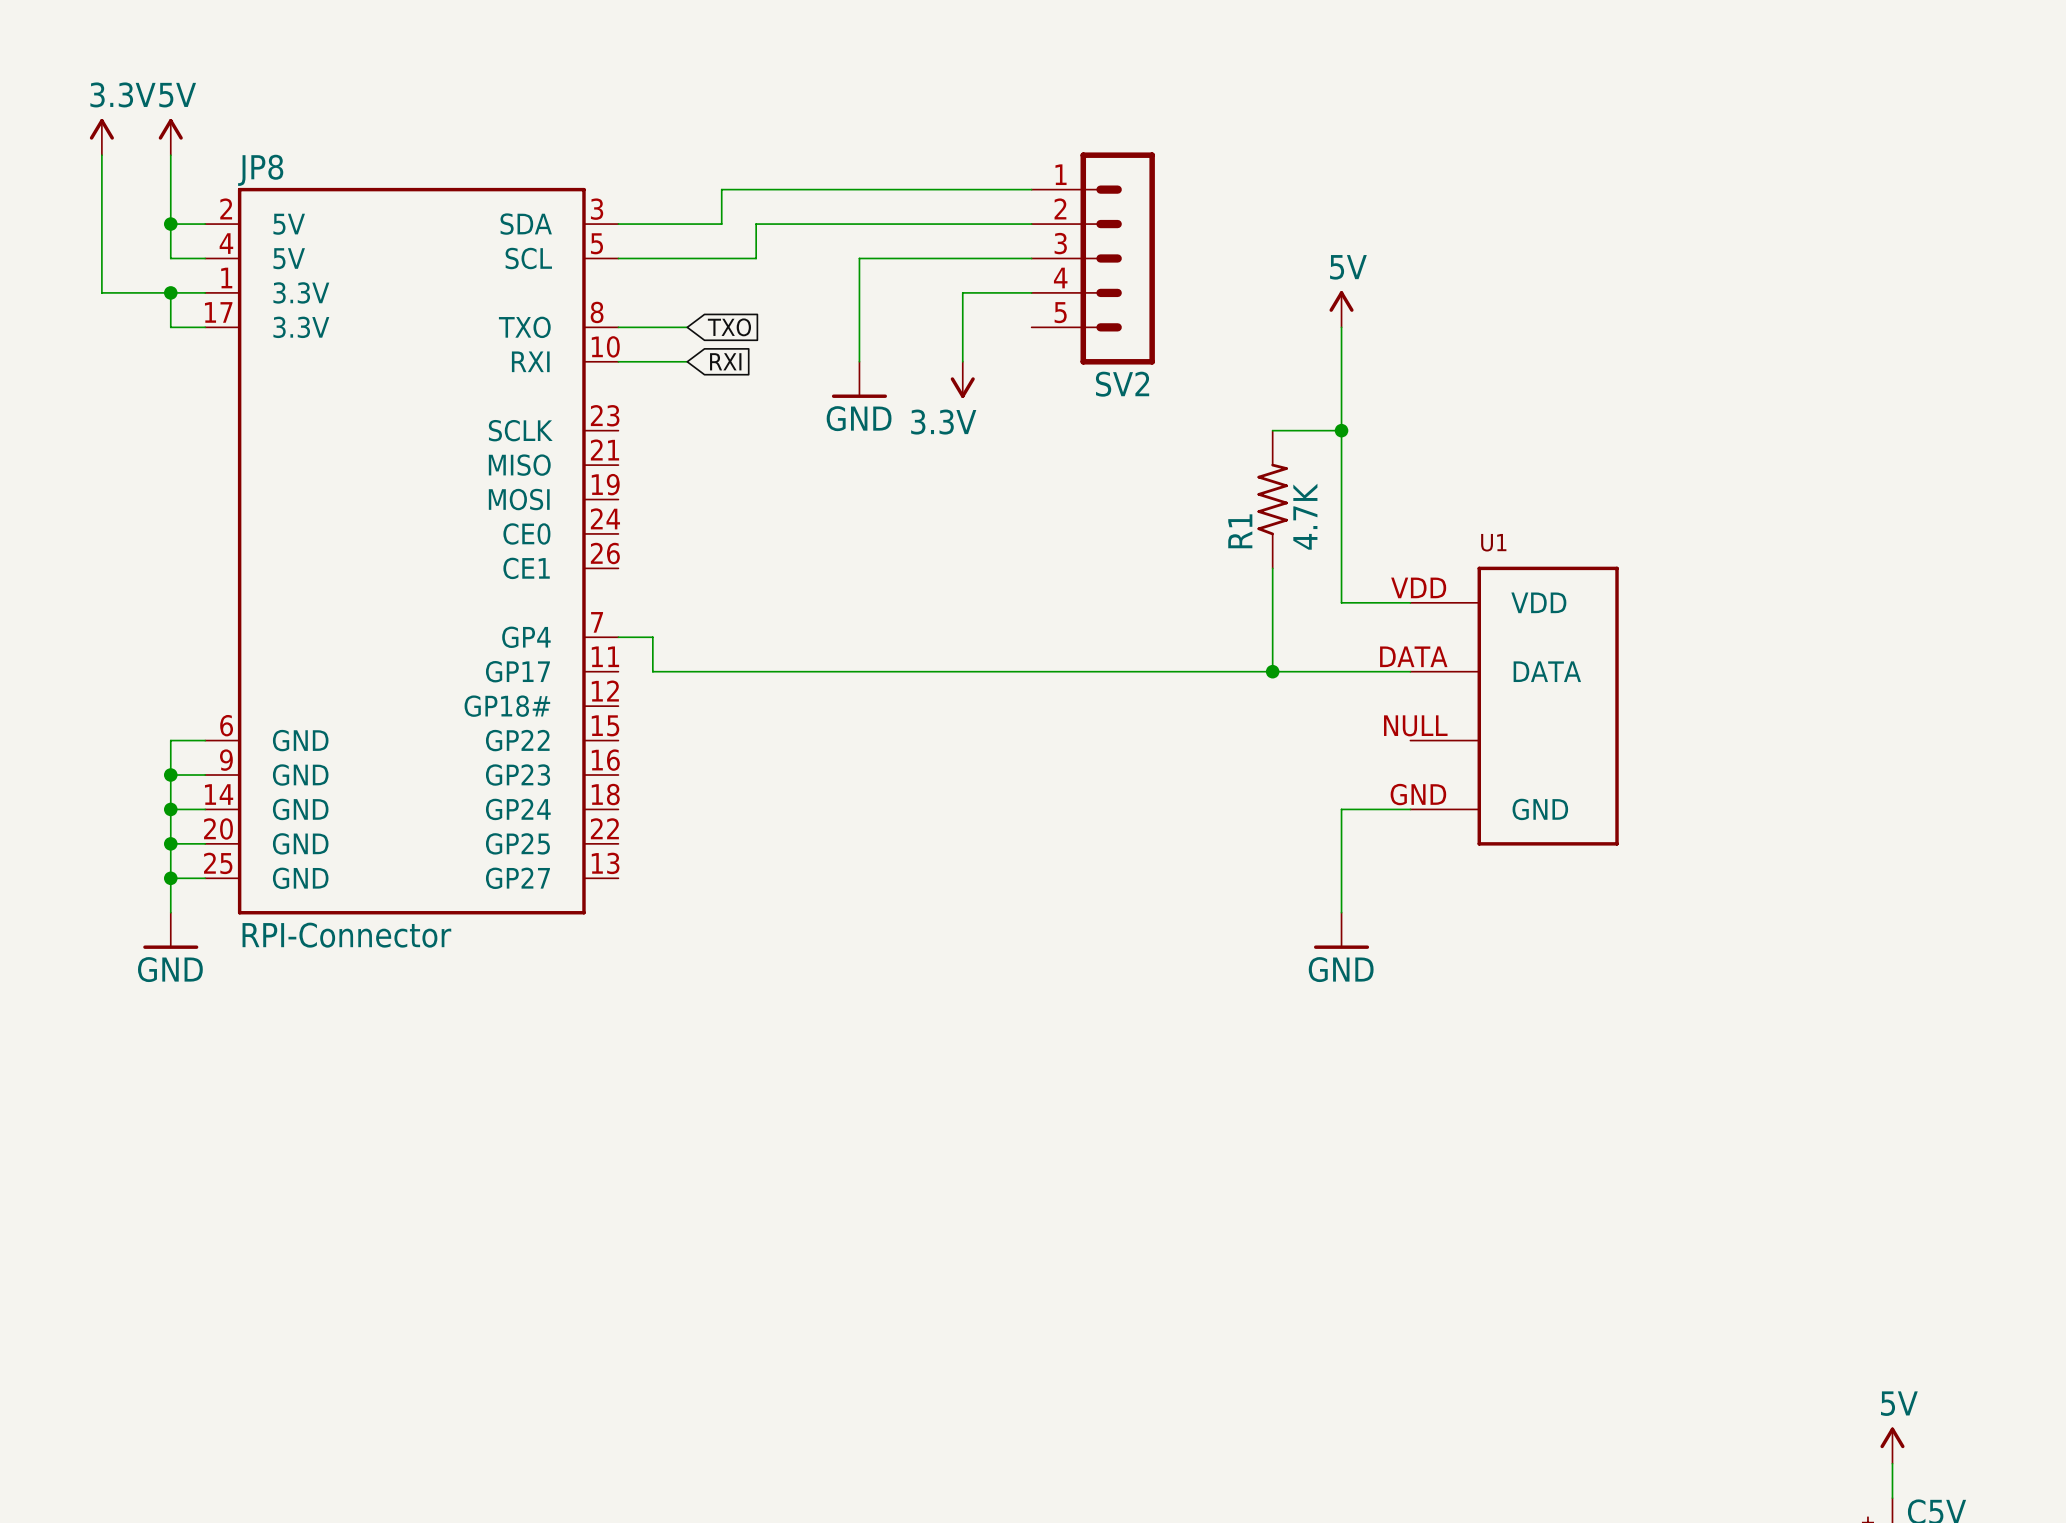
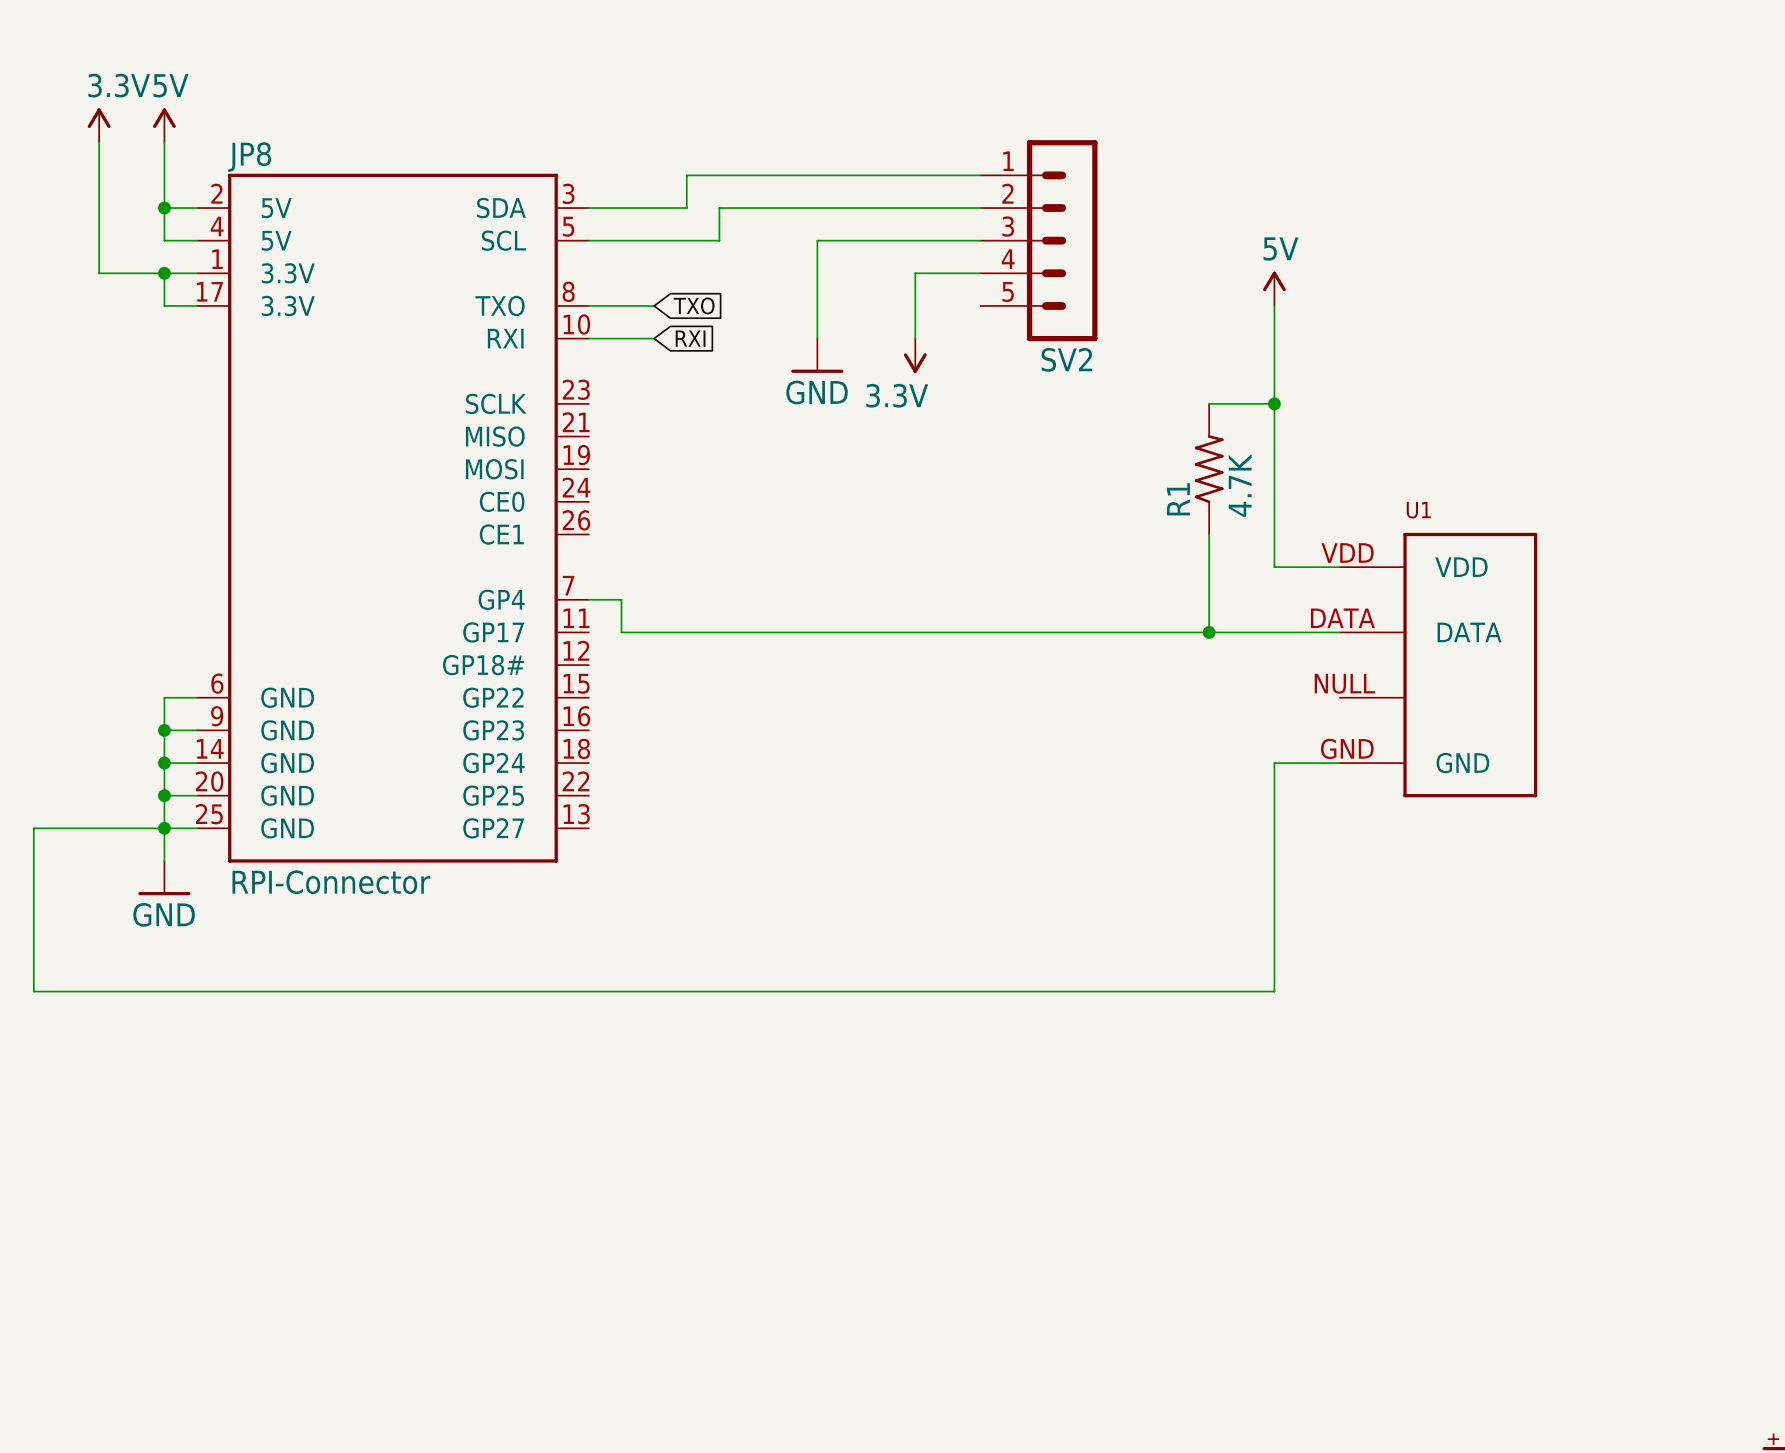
wire: none -> (164, 828) (33, 828) (33, 991) (1274, 991) (1274, 860)
power symbol: GND (1341, 930) -> none

